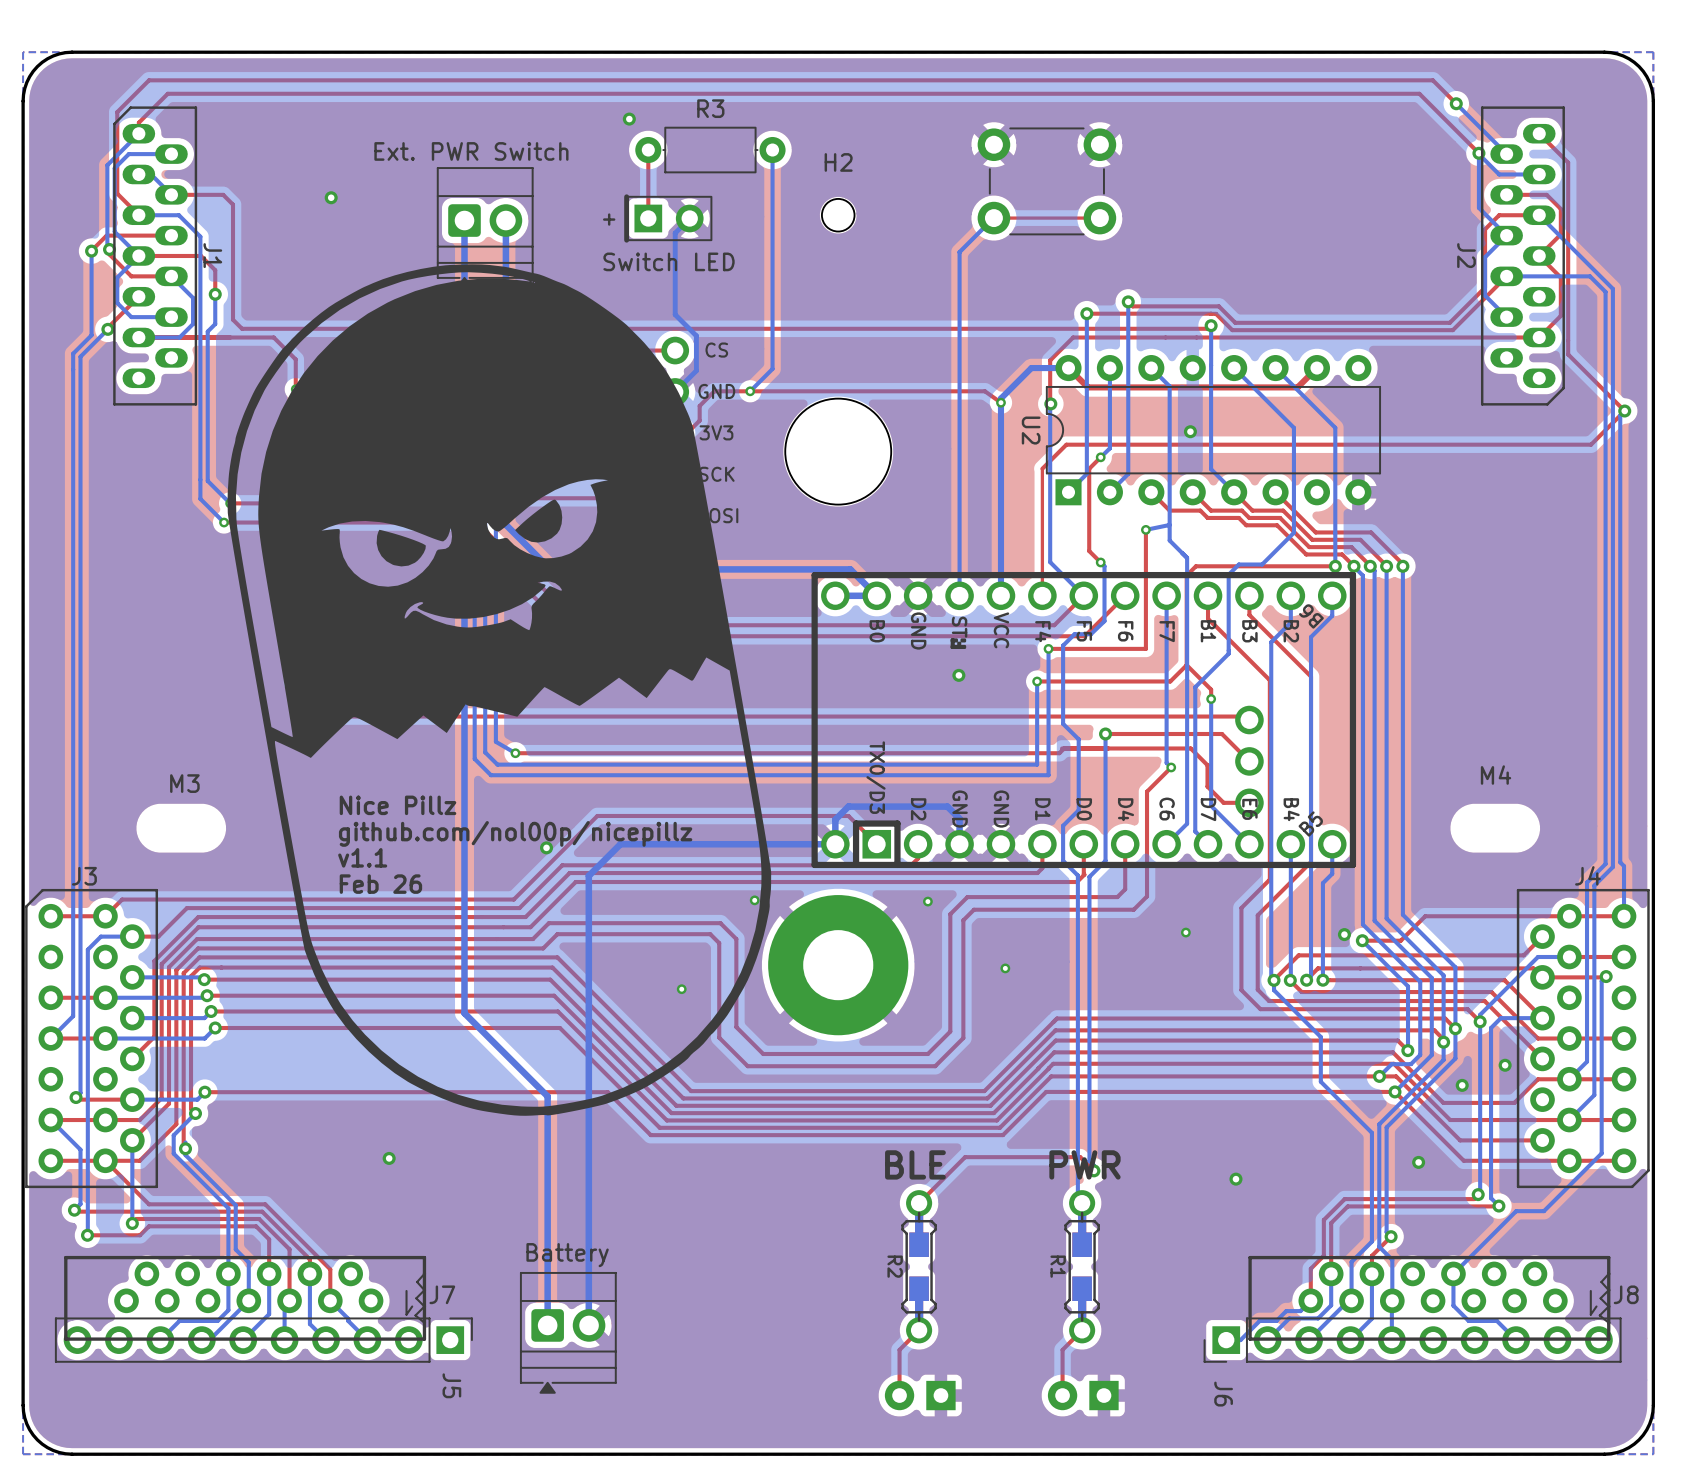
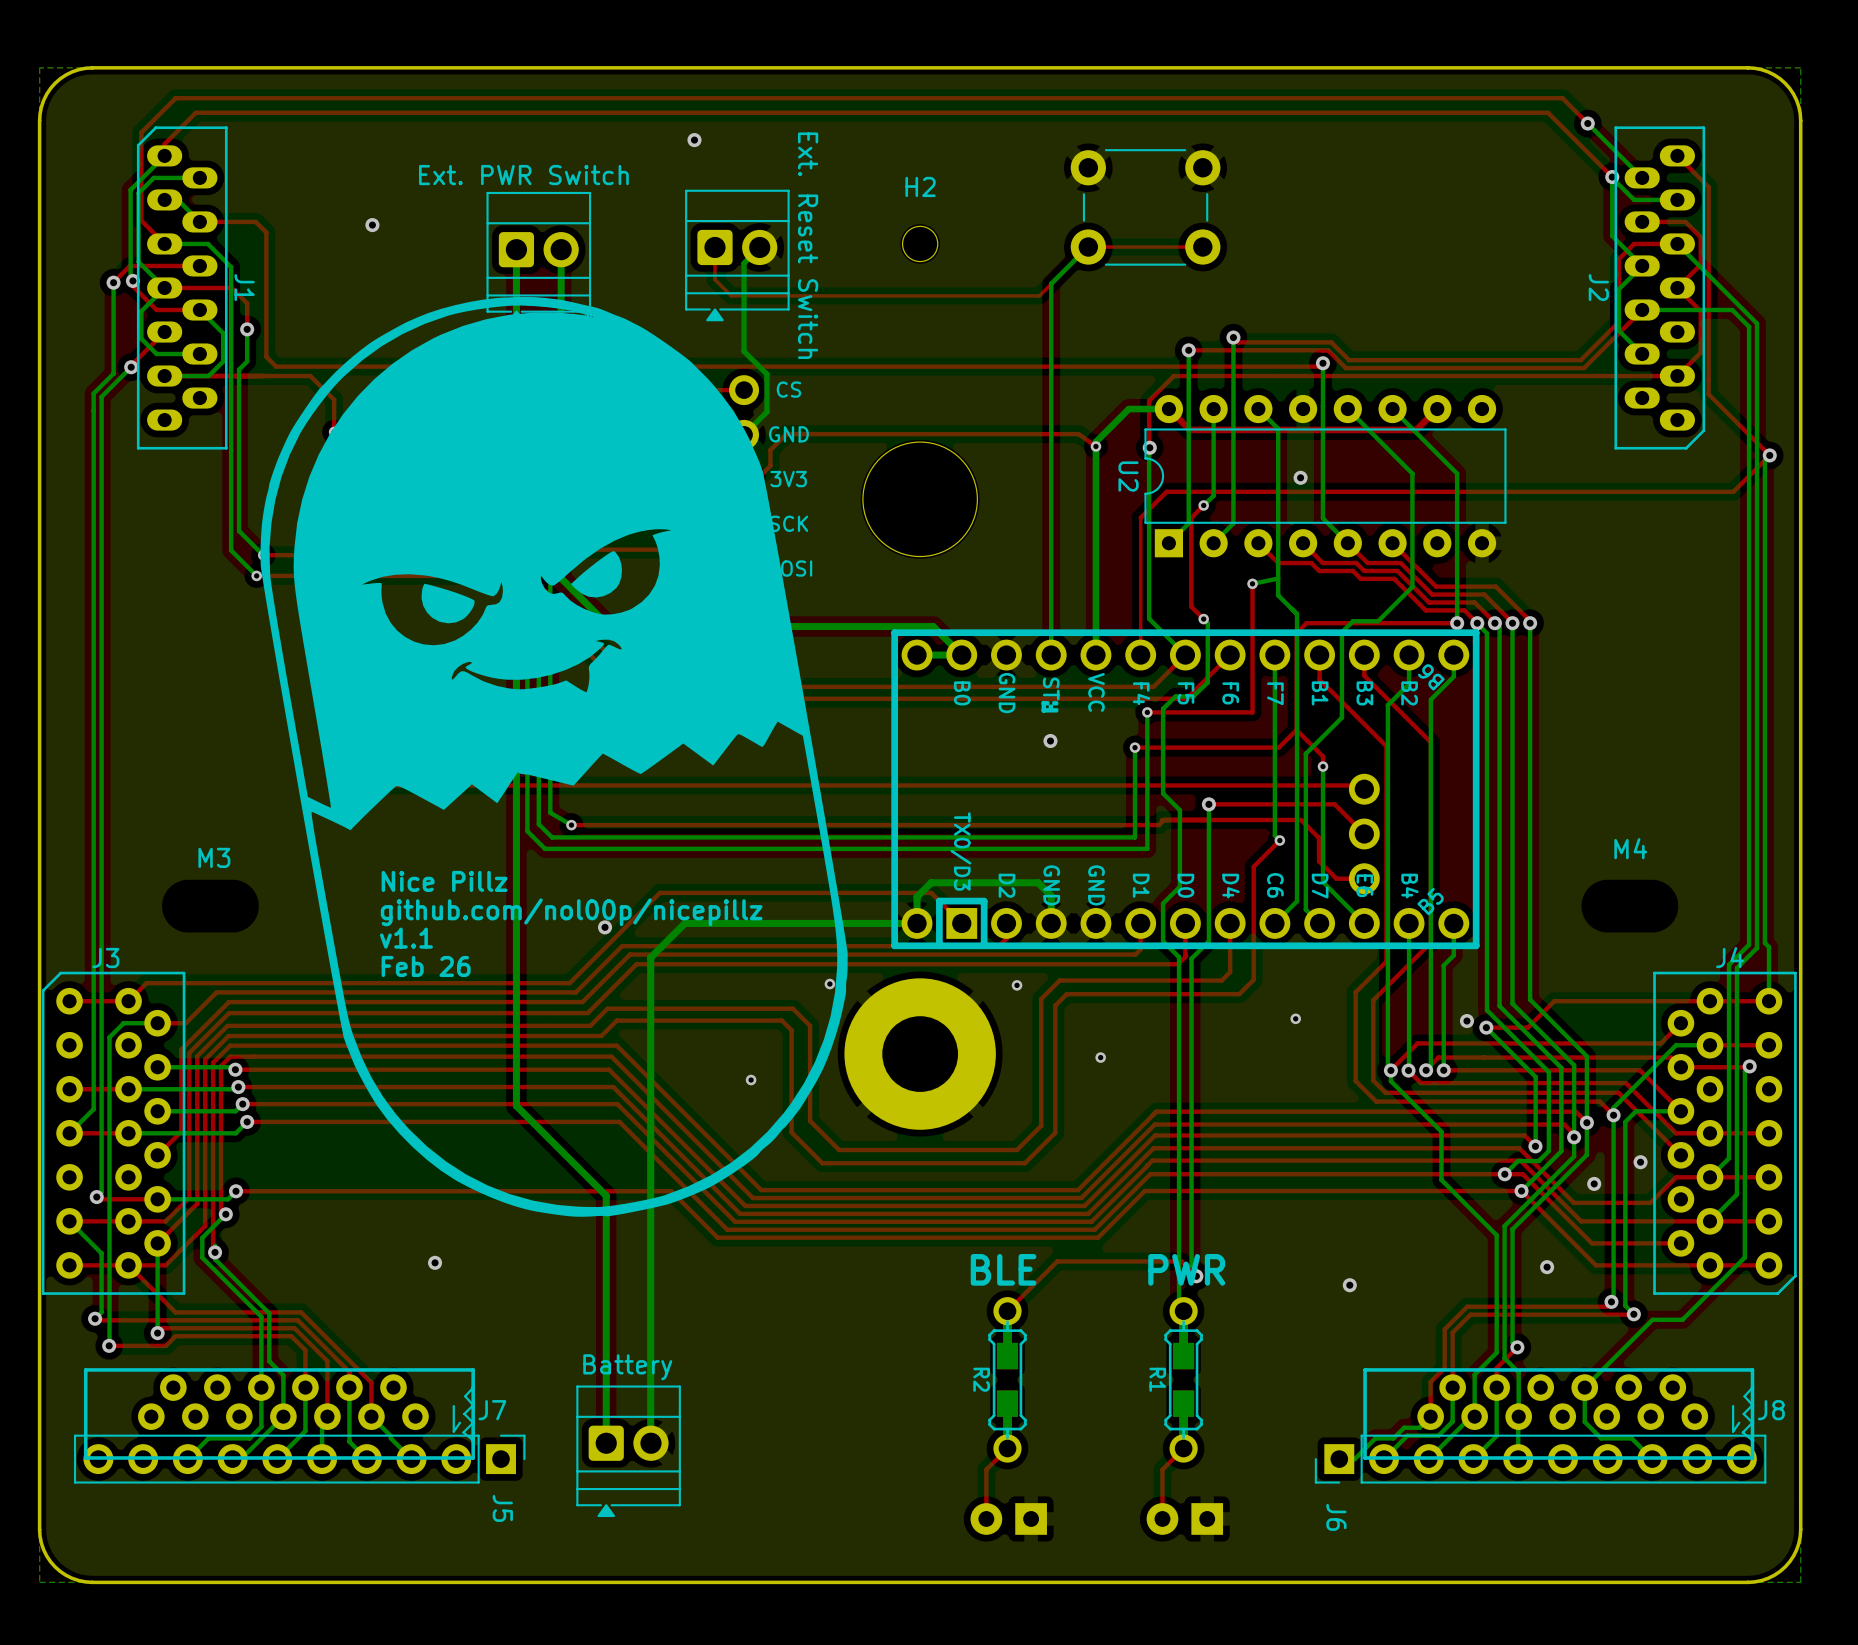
top track: (648, 150) (648, 218) -> (1088, 247) (1039, 295) (731, 295) (714, 279) (714, 247)
R3: (710, 150) -> none
bottom track: (772, 150) (772, 368) (750, 391) -> none
Switch LED: (668, 218) -> none
Ext. Reset Switch: none -> (737, 255)
via: (750, 391) -> none

